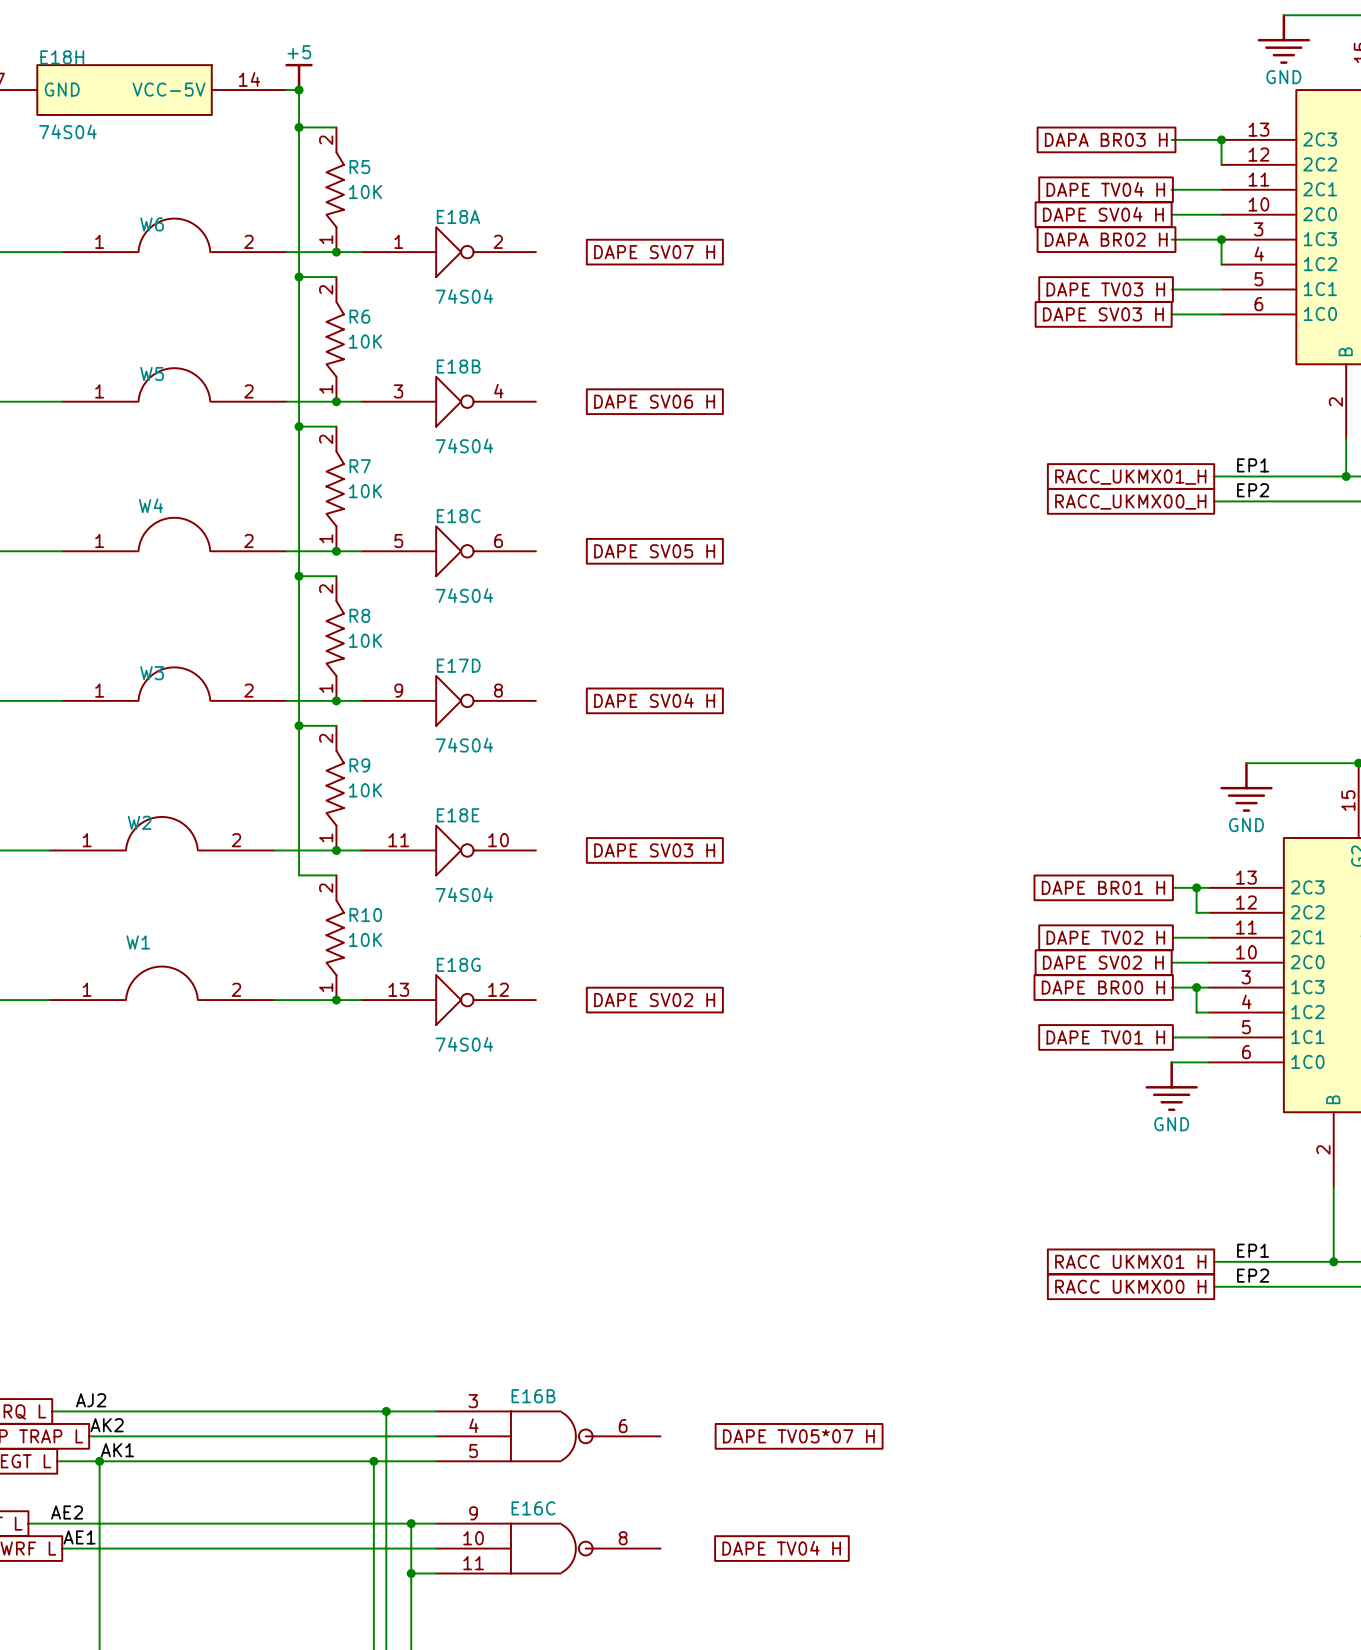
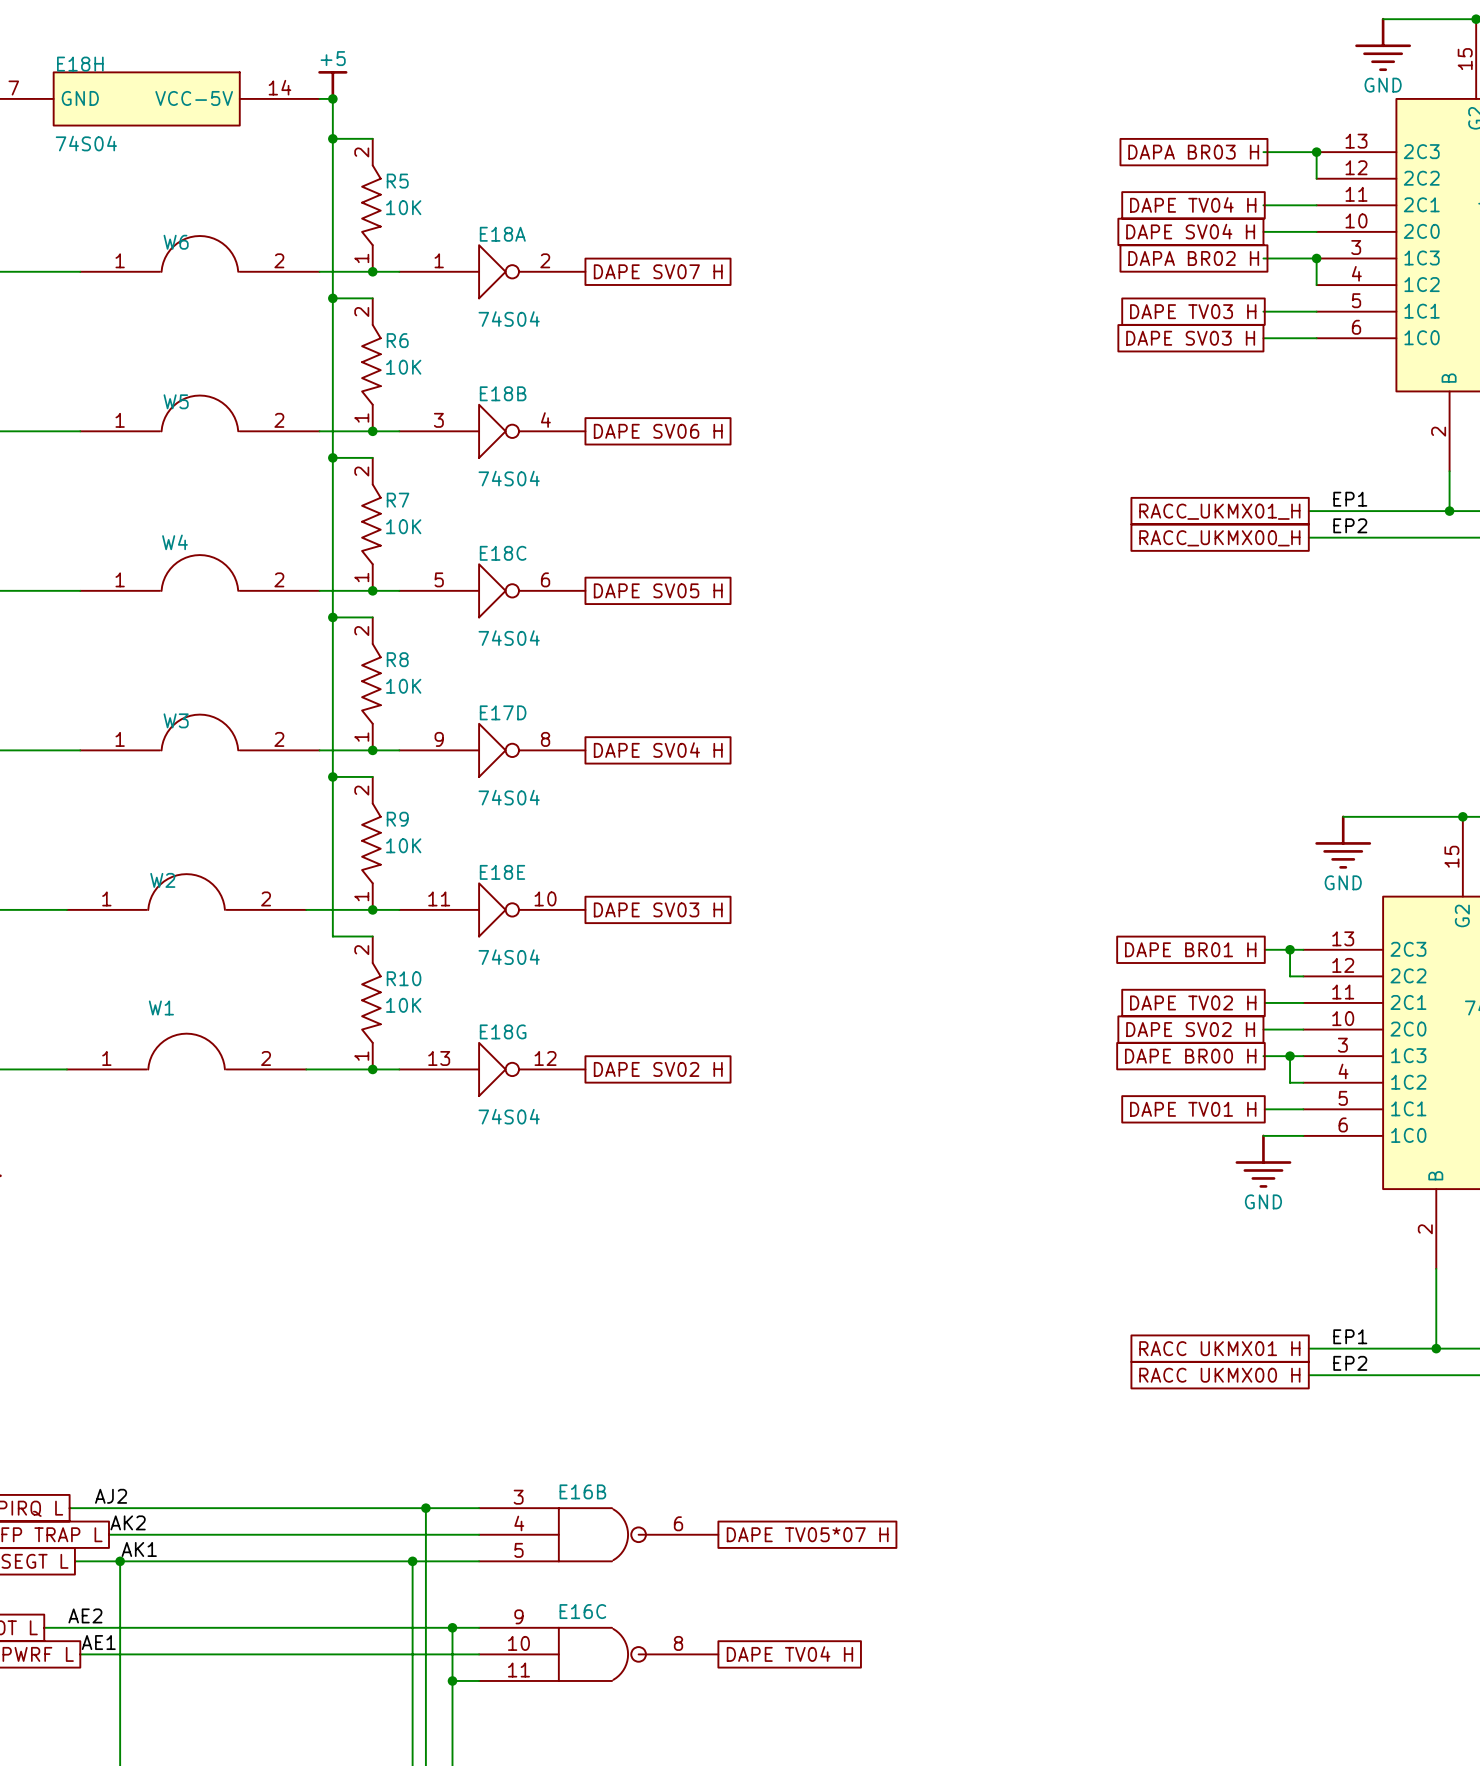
global label rotation: 0° (654, 252) -> 180° (658, 271)
global label rotation: 0° (654, 401) -> 180° (658, 431)
global label rotation: 0° (654, 551) -> 180° (658, 590)
global label rotation: 0° (654, 700) -> 180° (658, 750)
global label rotation: 0° (654, 850) -> 180° (658, 909)
global label rotation: 0° (654, 1000) -> 180° (658, 1069)
global label rotation: 0° (798, 1436) -> 180° (807, 1534)
global label rotation: 0° (781, 1548) -> 180° (789, 1654)

